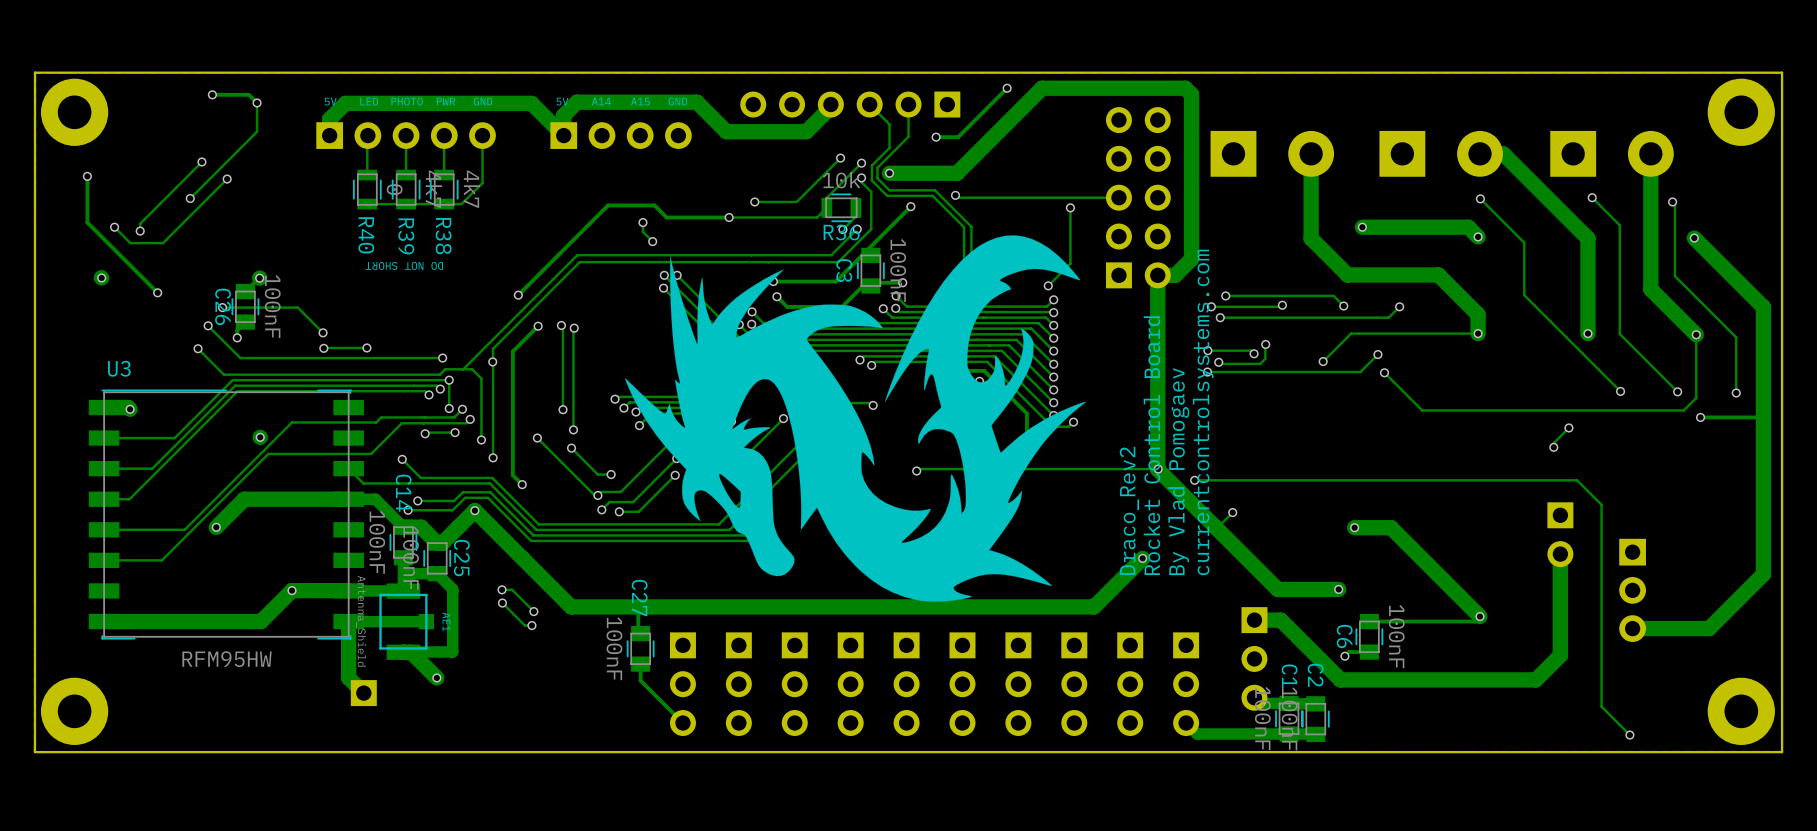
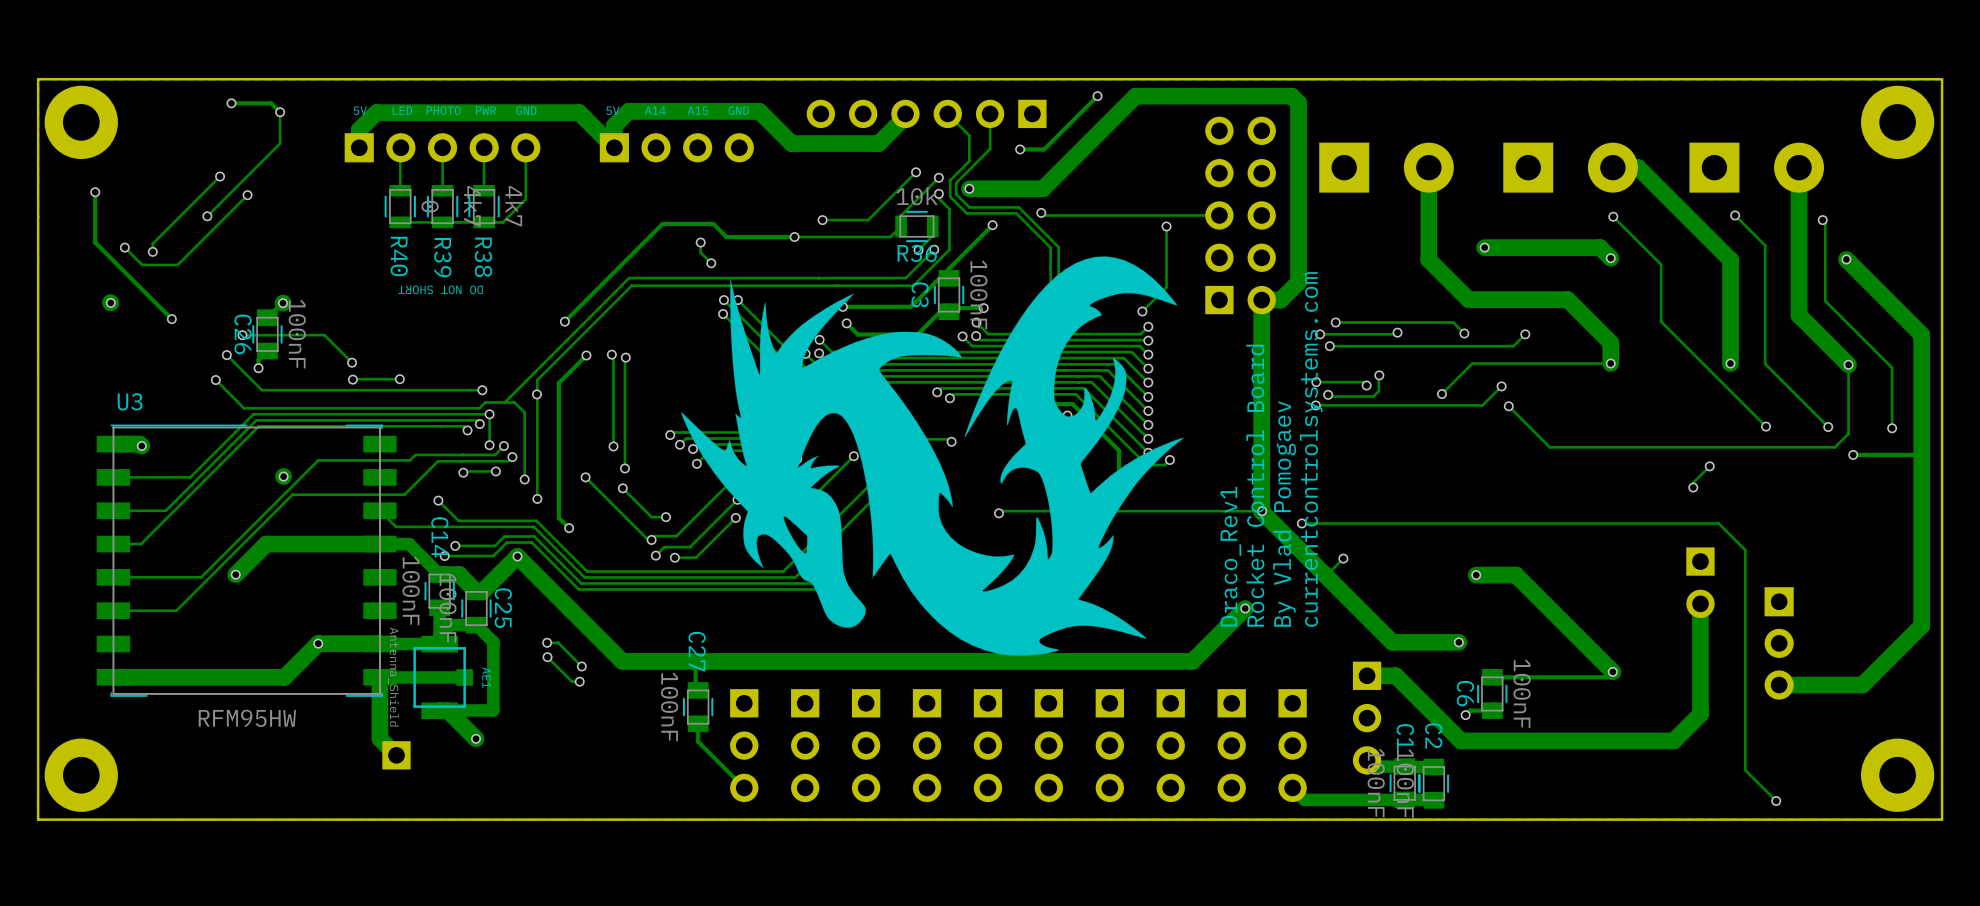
text: Draco_Rev2 (1129, 510) -> Draco_Rev1 (1230, 556)

